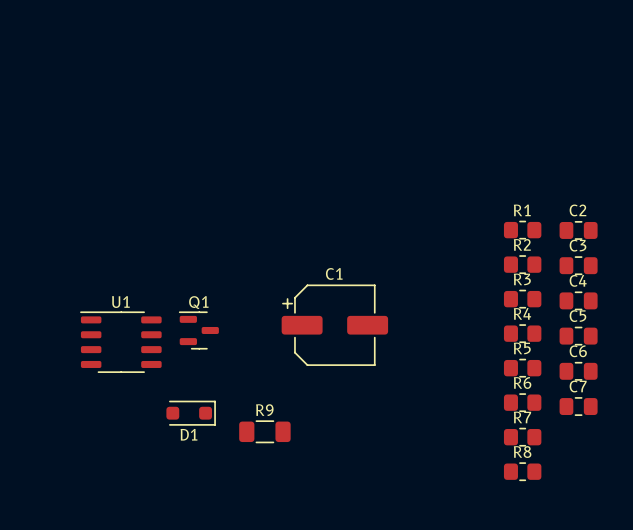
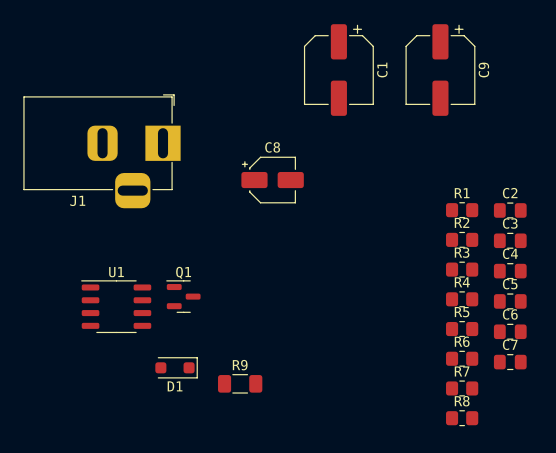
C9: none -> (440, 70)
J1: none -> (102, 151)
C8: none -> (272, 180)
C1 rotation: 0° (334, 325) -> 90° clockwise (338, 70)
C1 position: (334, 325) -> (338, 70)

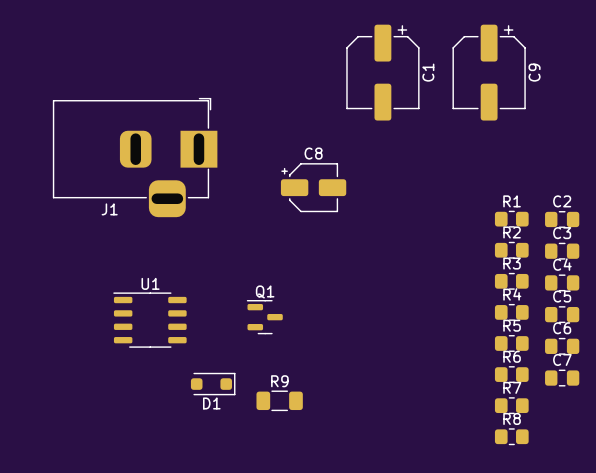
Q1 position: (183, 296) -> (264, 317)

